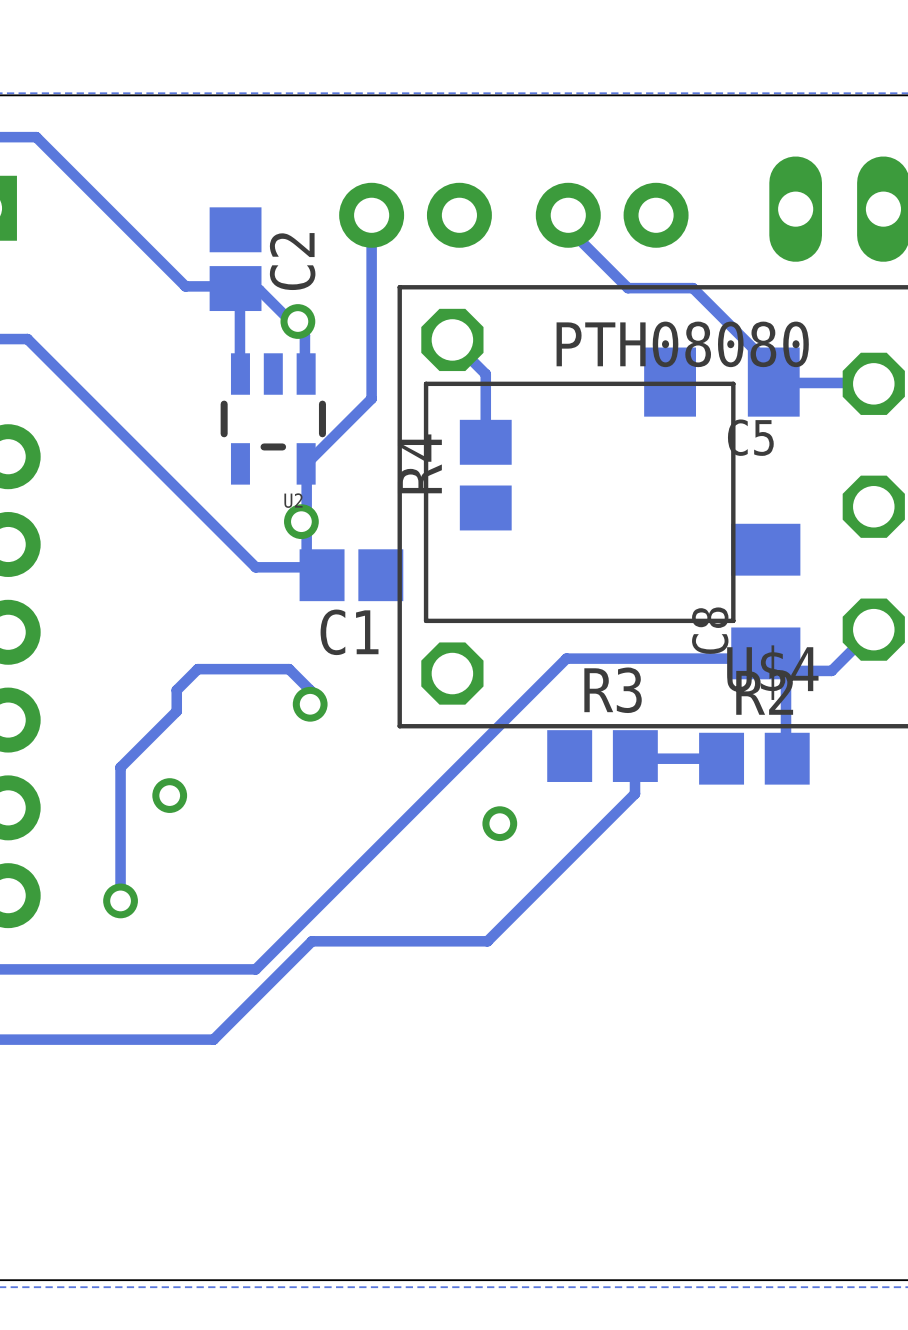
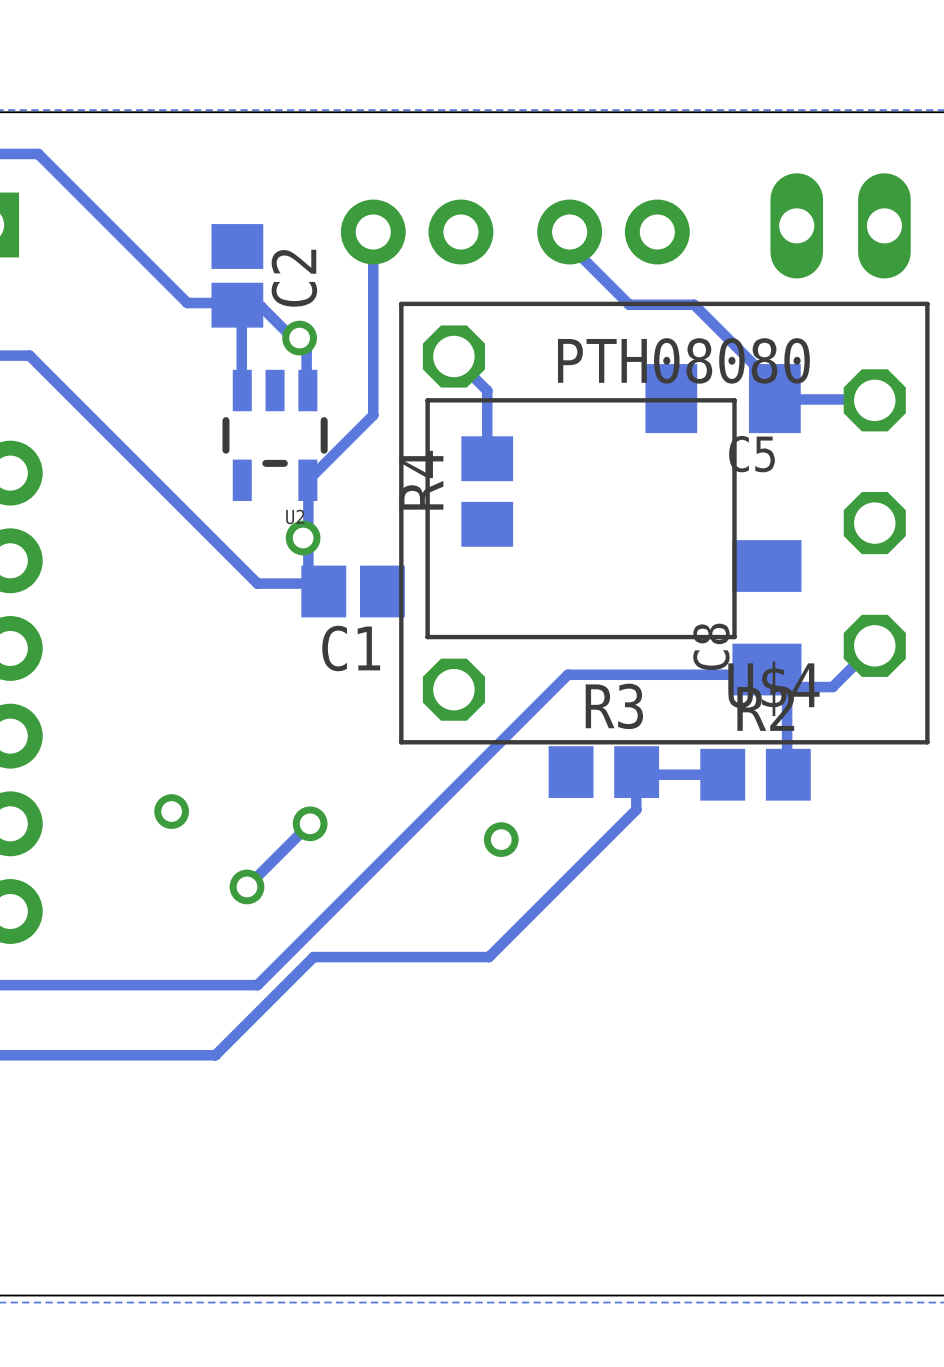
track: (310, 704) (310, 690) (289, 669) (197, 669) (176, 690) (176, 711) (120, 767) (120, 900) -> none
via: (310, 704) -> none
track: none -> (310, 823) (247, 886)
via: none -> (310, 823)
via: none -> (247, 886)
via: (120, 900) -> none

